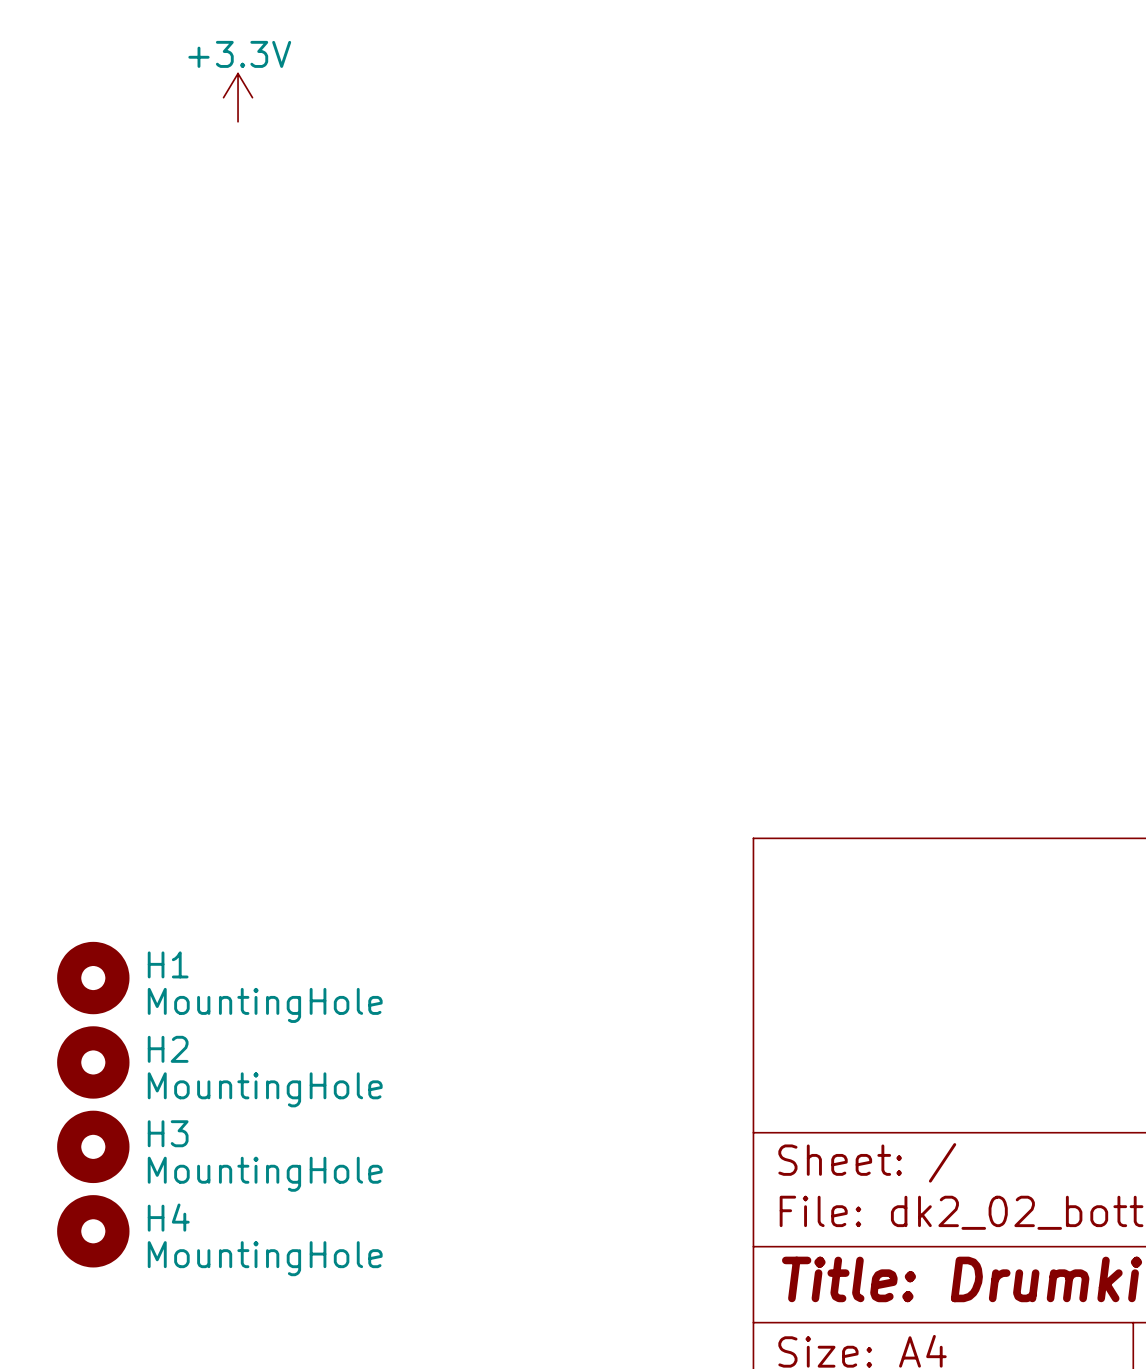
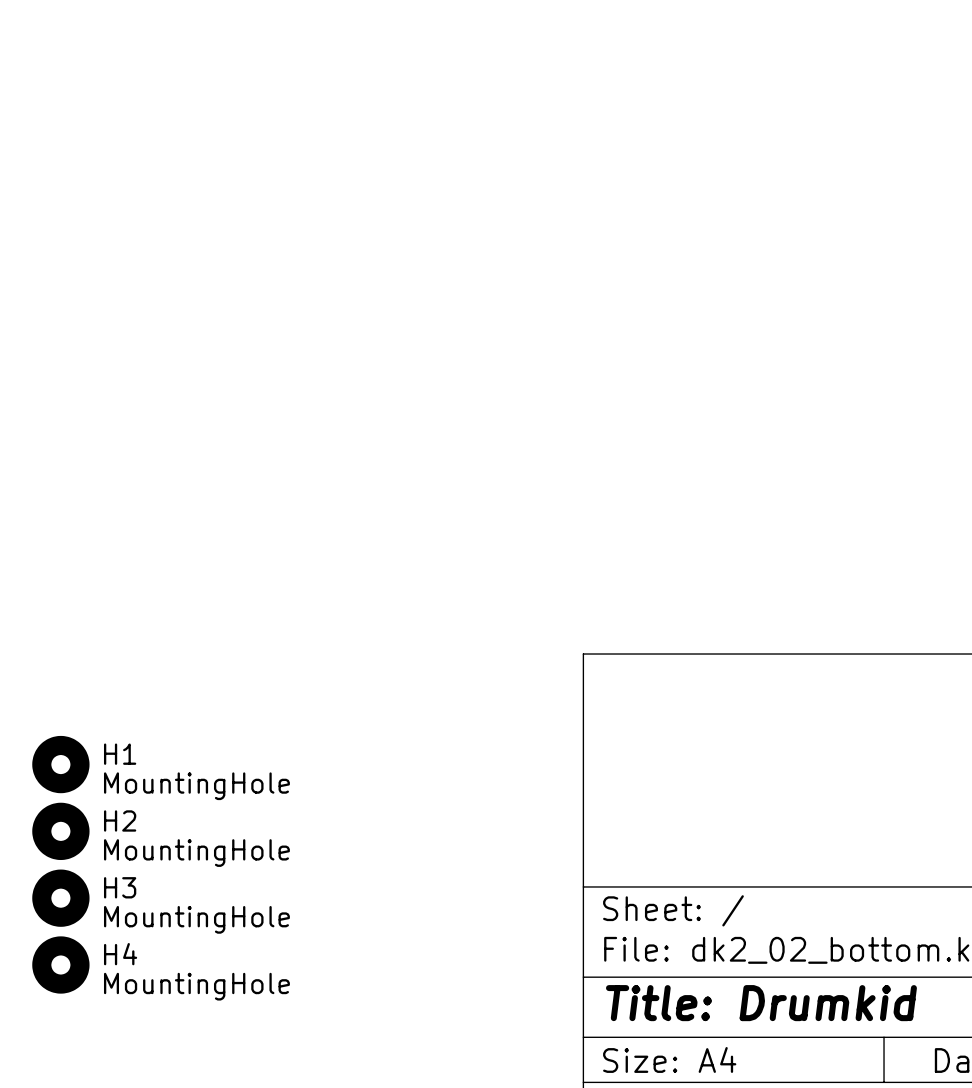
power symbol: +3.3V (238, 97) -> none

